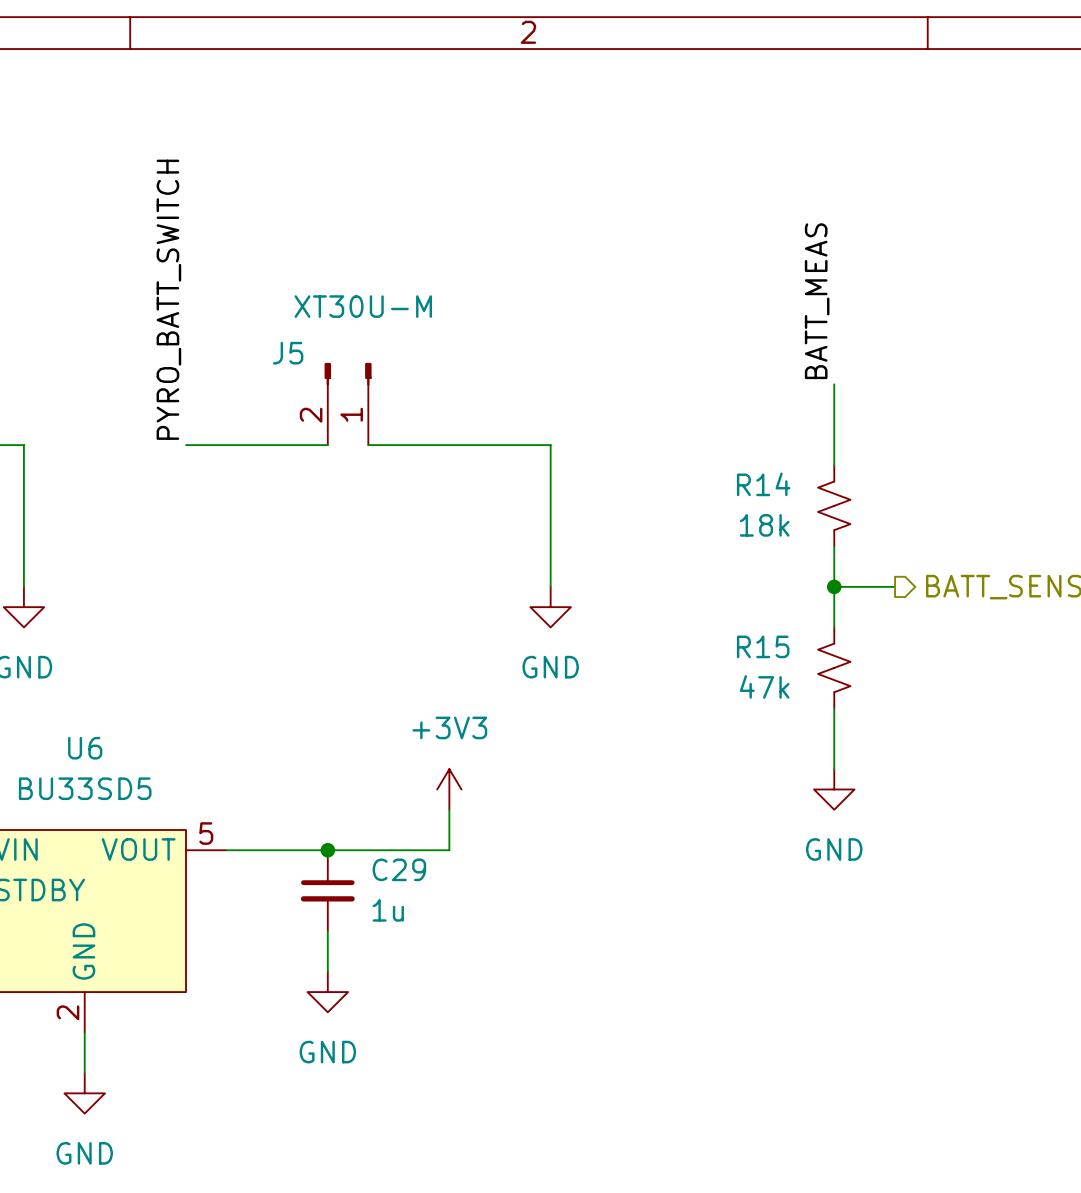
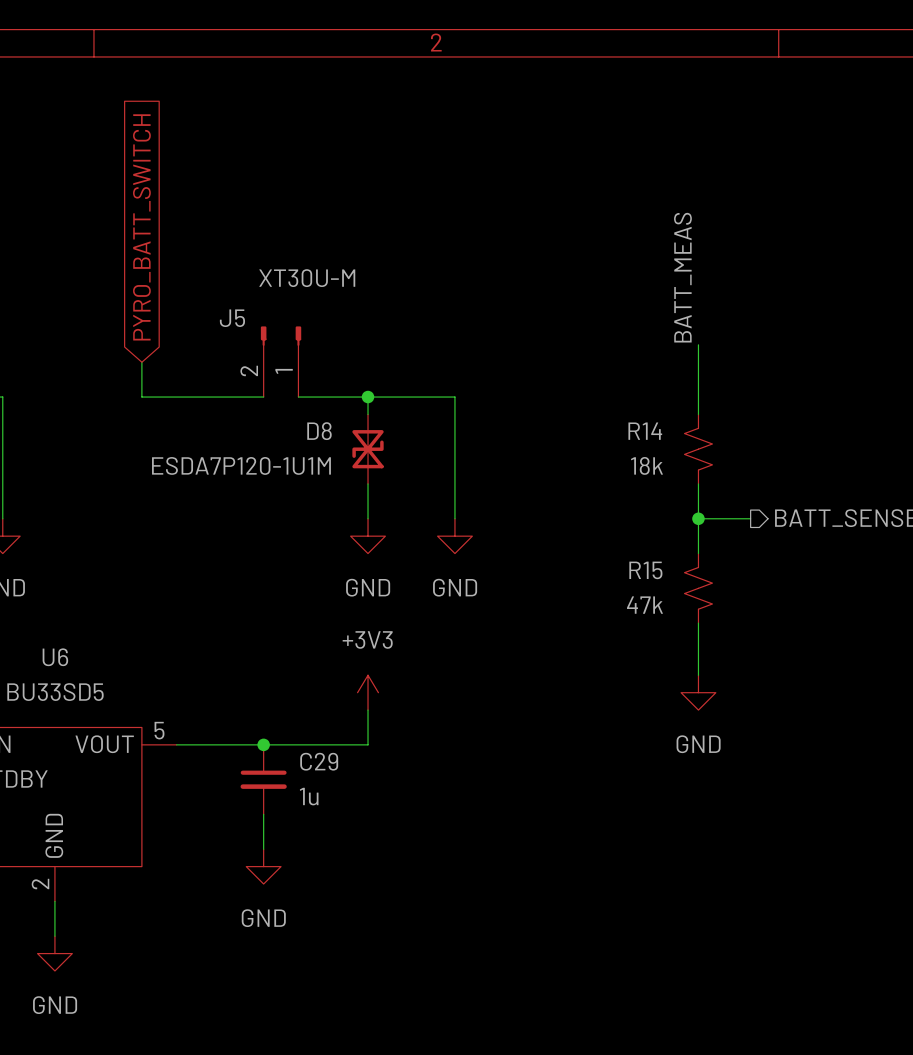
global label: none -> PYRO_BATT_SWITCH (141, 227)
label: PYRO_BATT_SWITCH (168, 299) -> none
wire: none -> (141, 362) (141, 397)
wire: none -> (368, 397) (368, 414)
junction: none -> (368, 397)
D8: none -> ESDA7P120-1U1M (368, 449)
wire: none -> (368, 483) (368, 518)
power symbol: none -> GND (368, 536)

